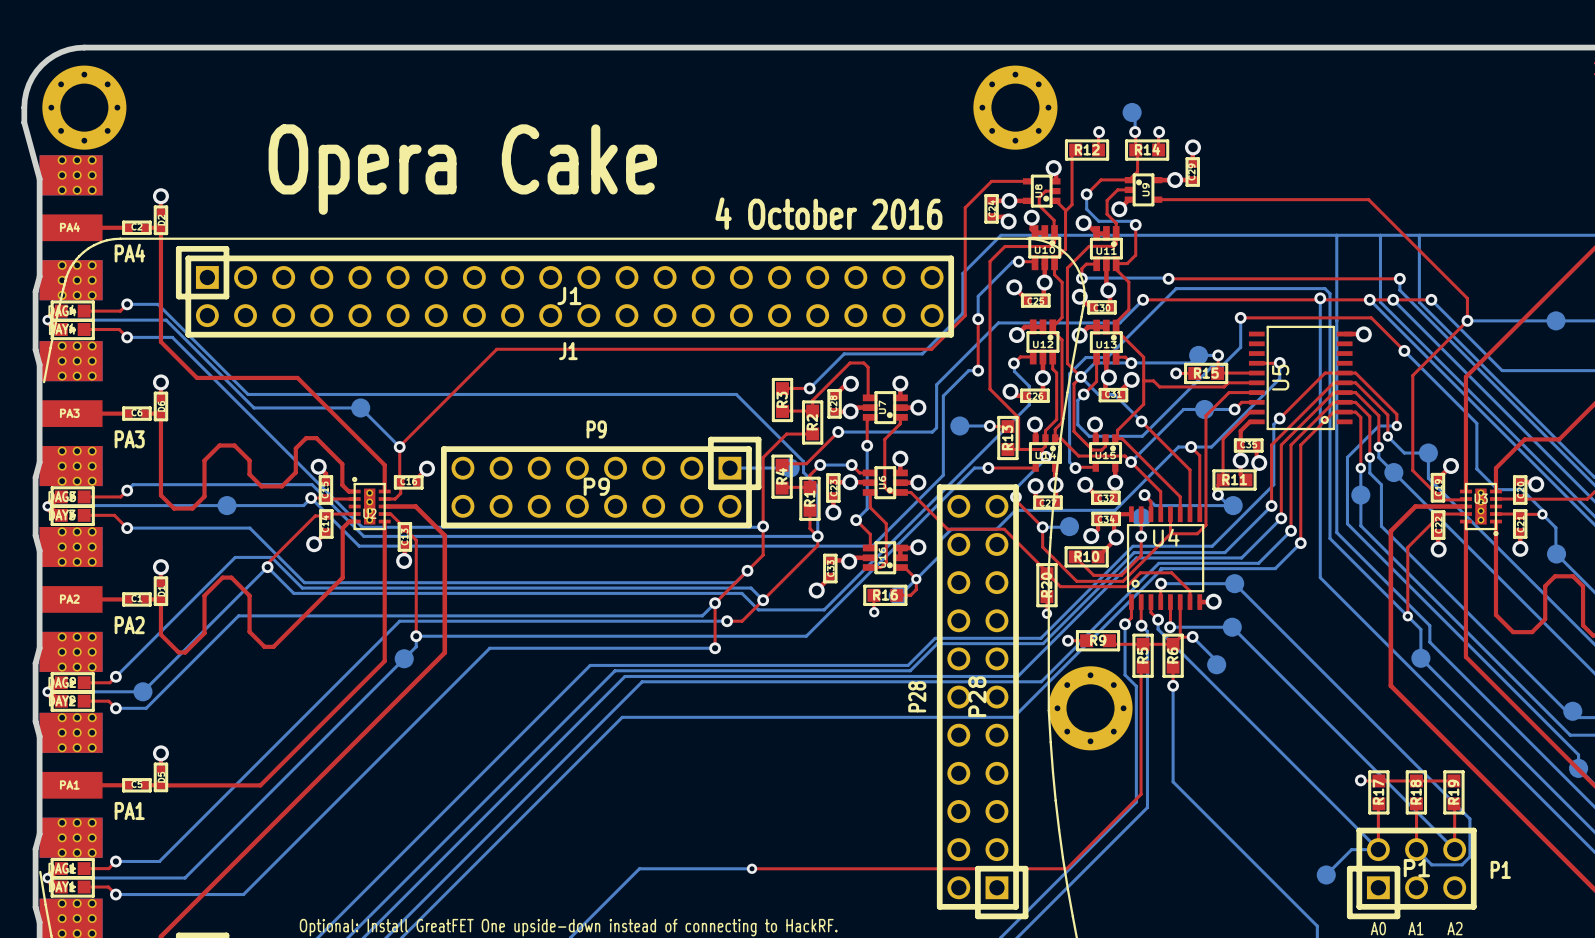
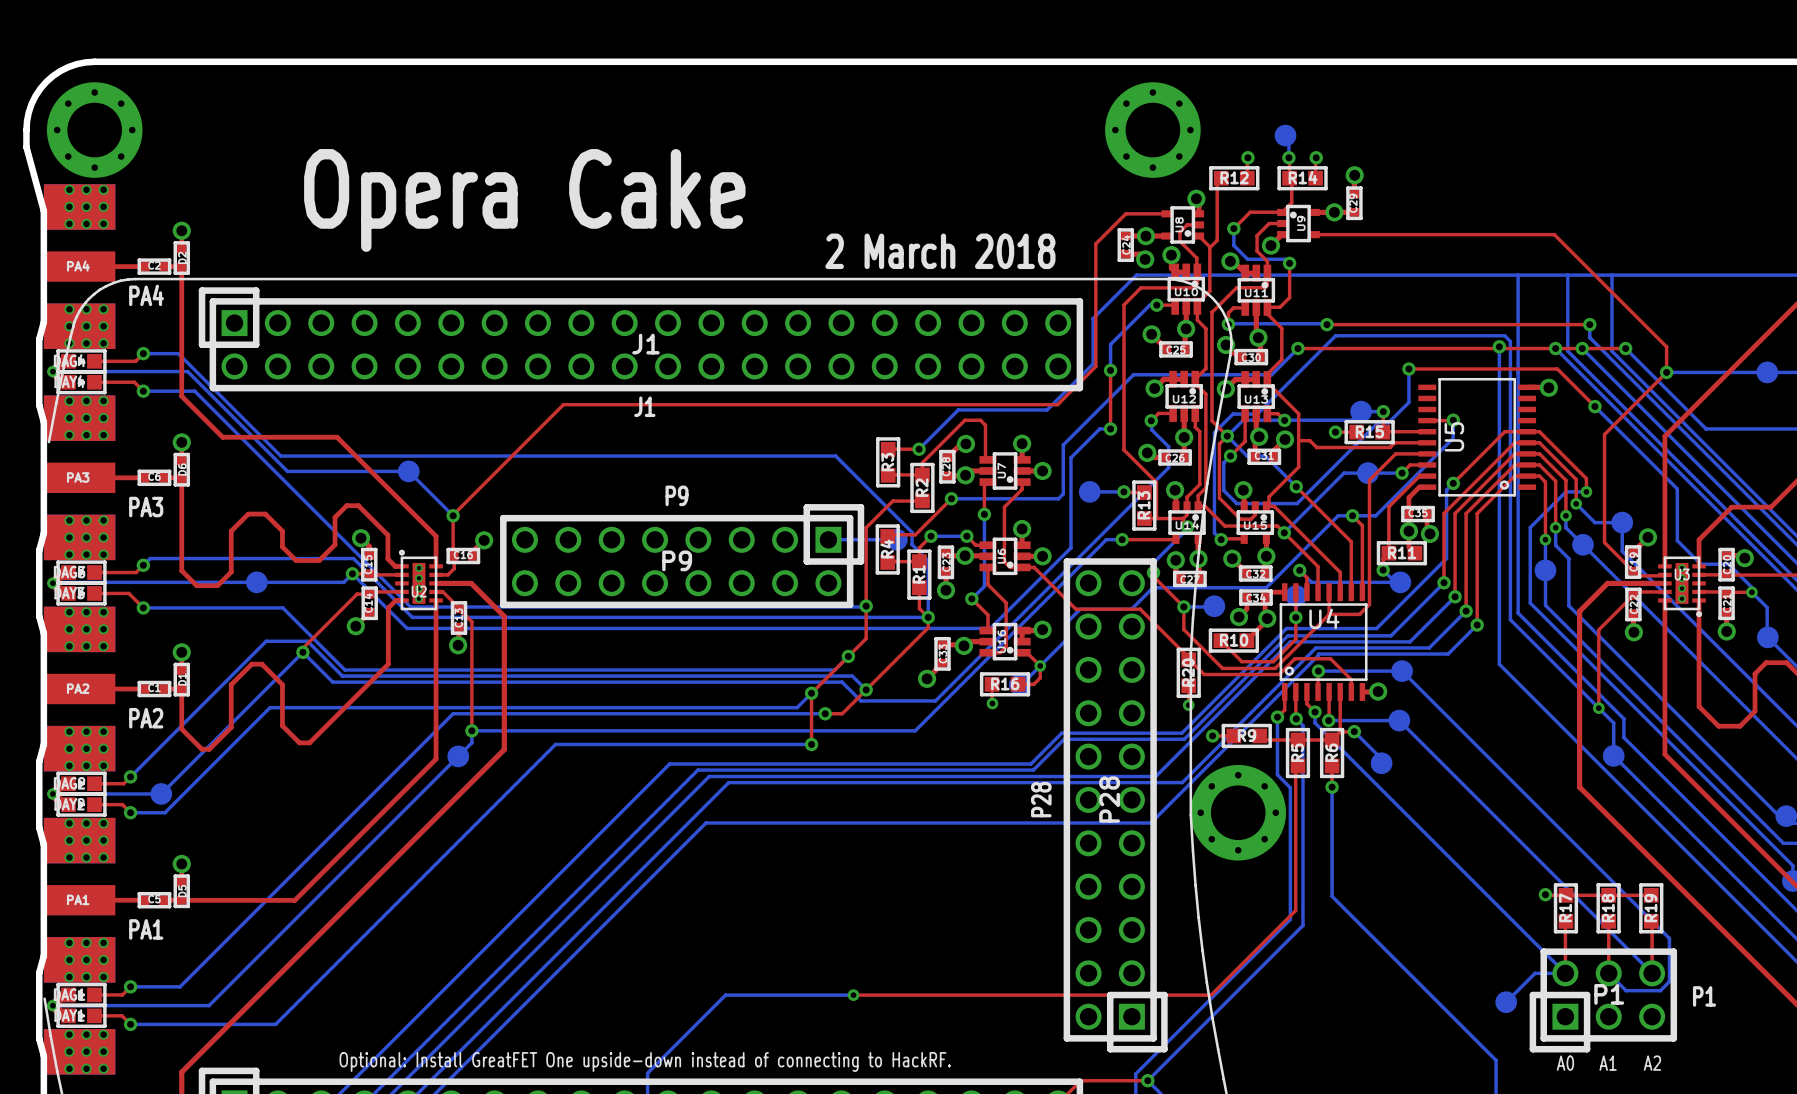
text: 4 October 2016 (828, 213) -> 2 March 2018 (940, 251)

